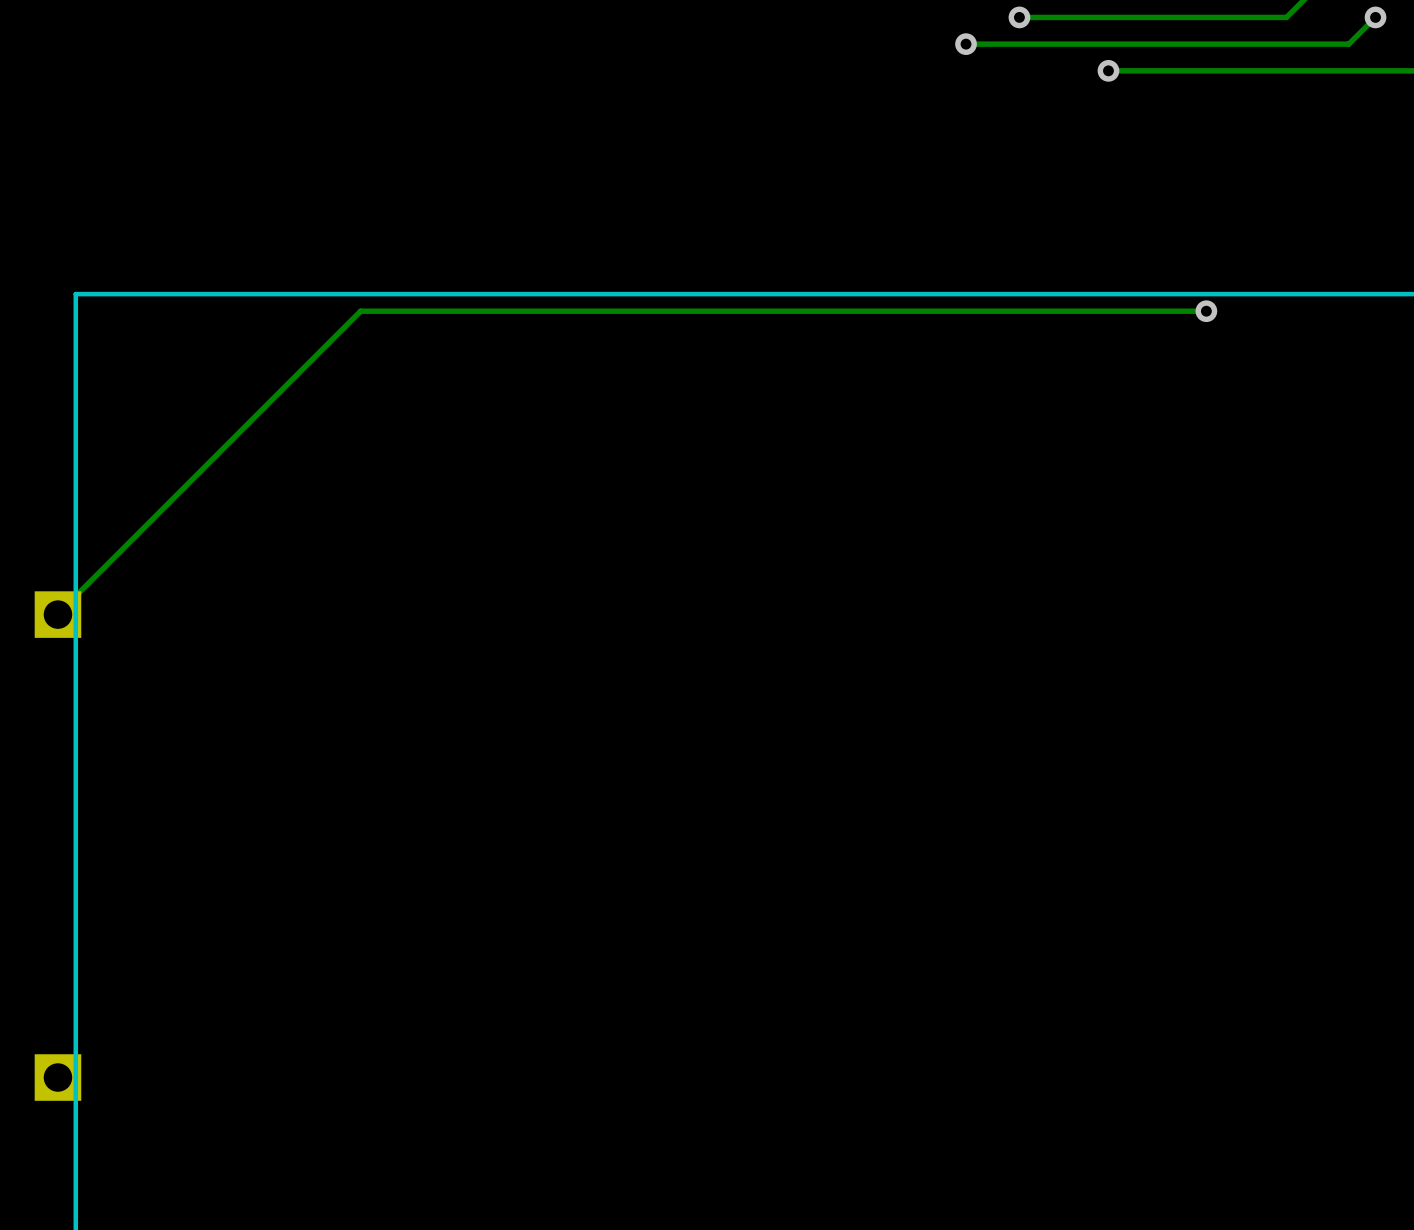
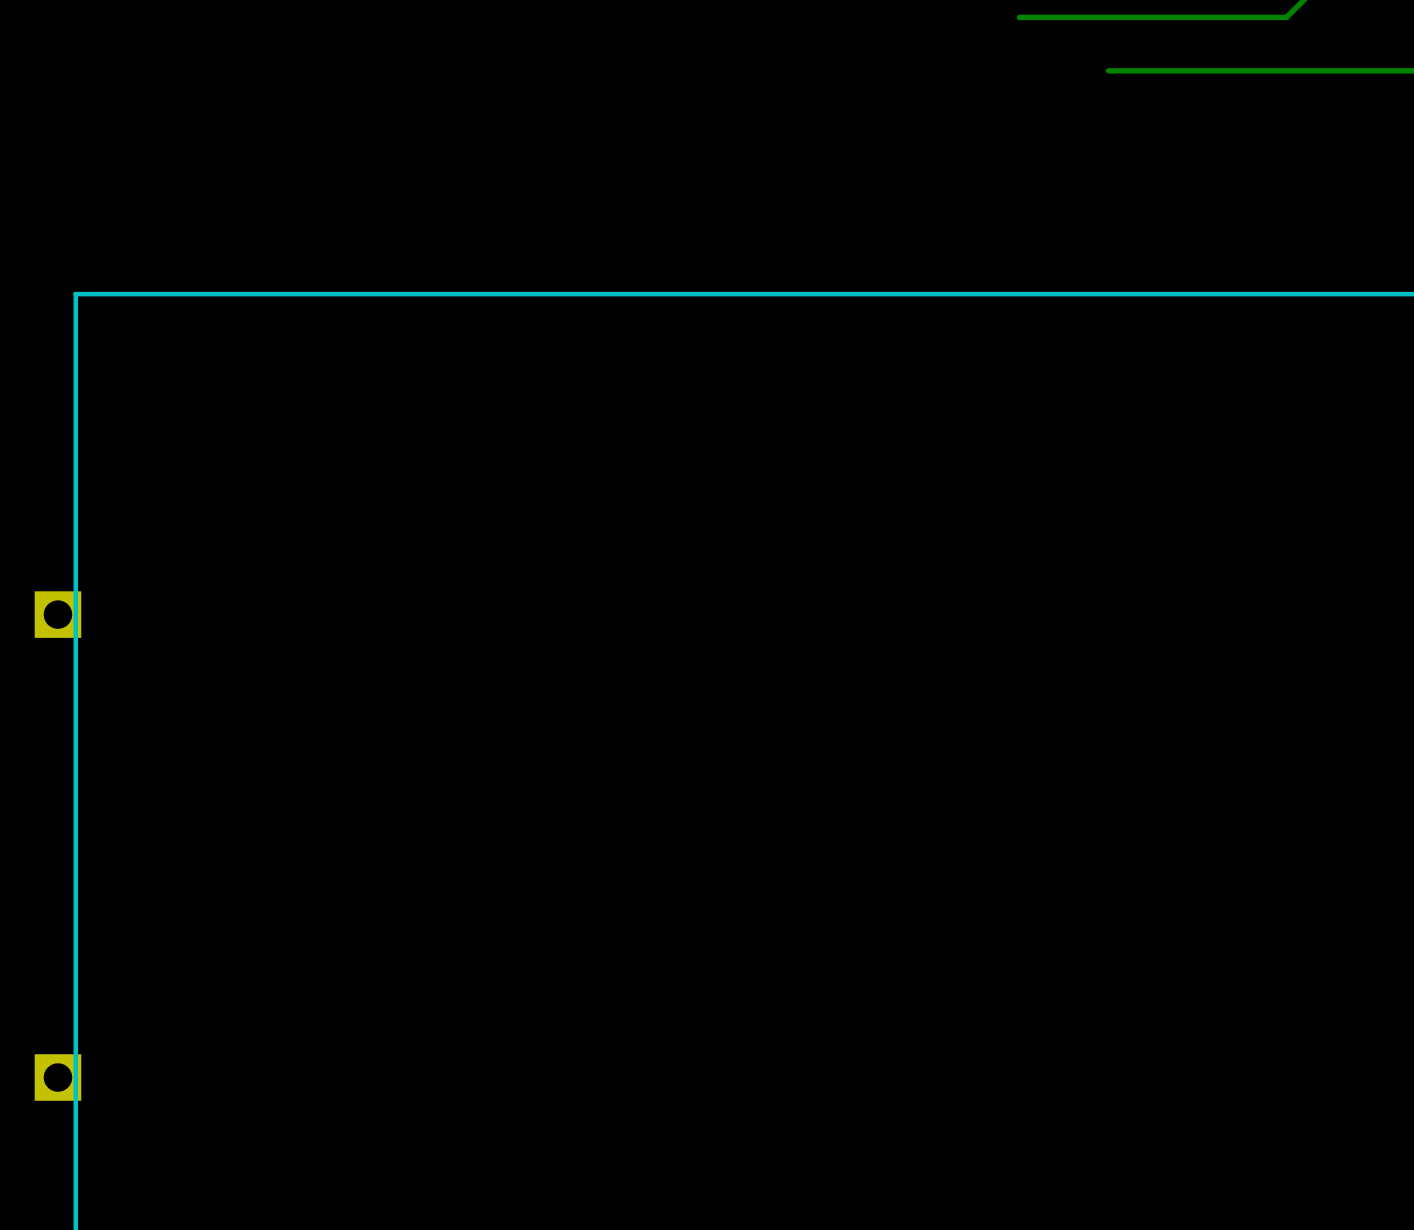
via: (1019, 17) -> none
track: (1375, 17) (1348, 44) (966, 44) -> none
via: (1375, 17) -> none
via: (966, 44) -> none
via: (1108, 70) -> none
track: (1206, 311) (360, 311) (57, 613) -> none
via: (1206, 311) -> none

